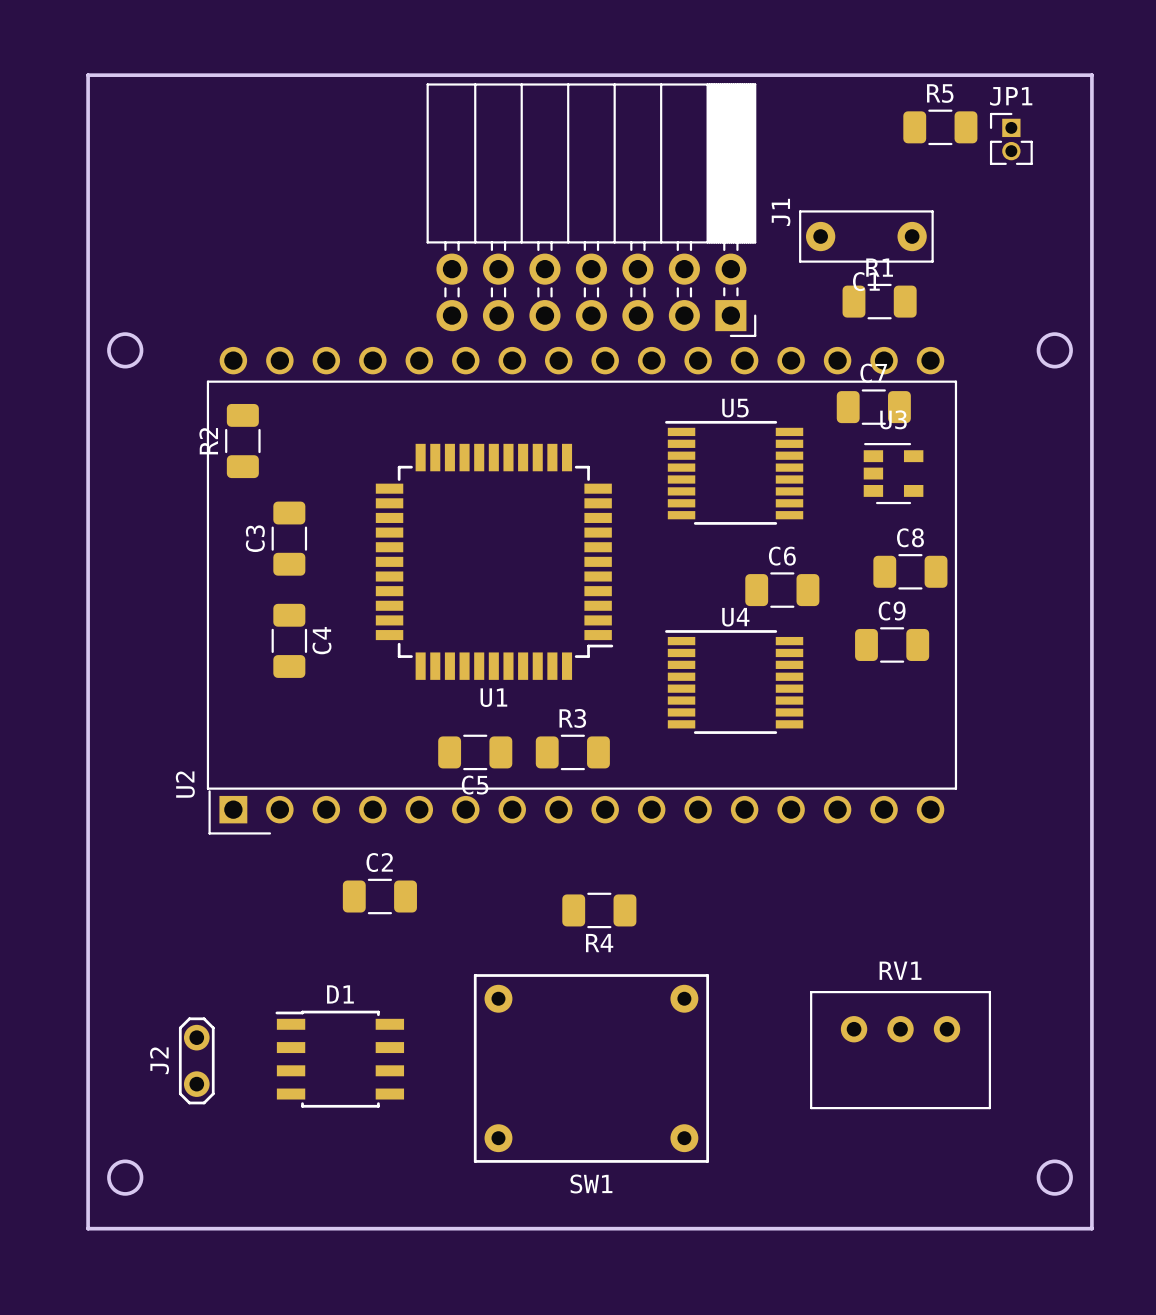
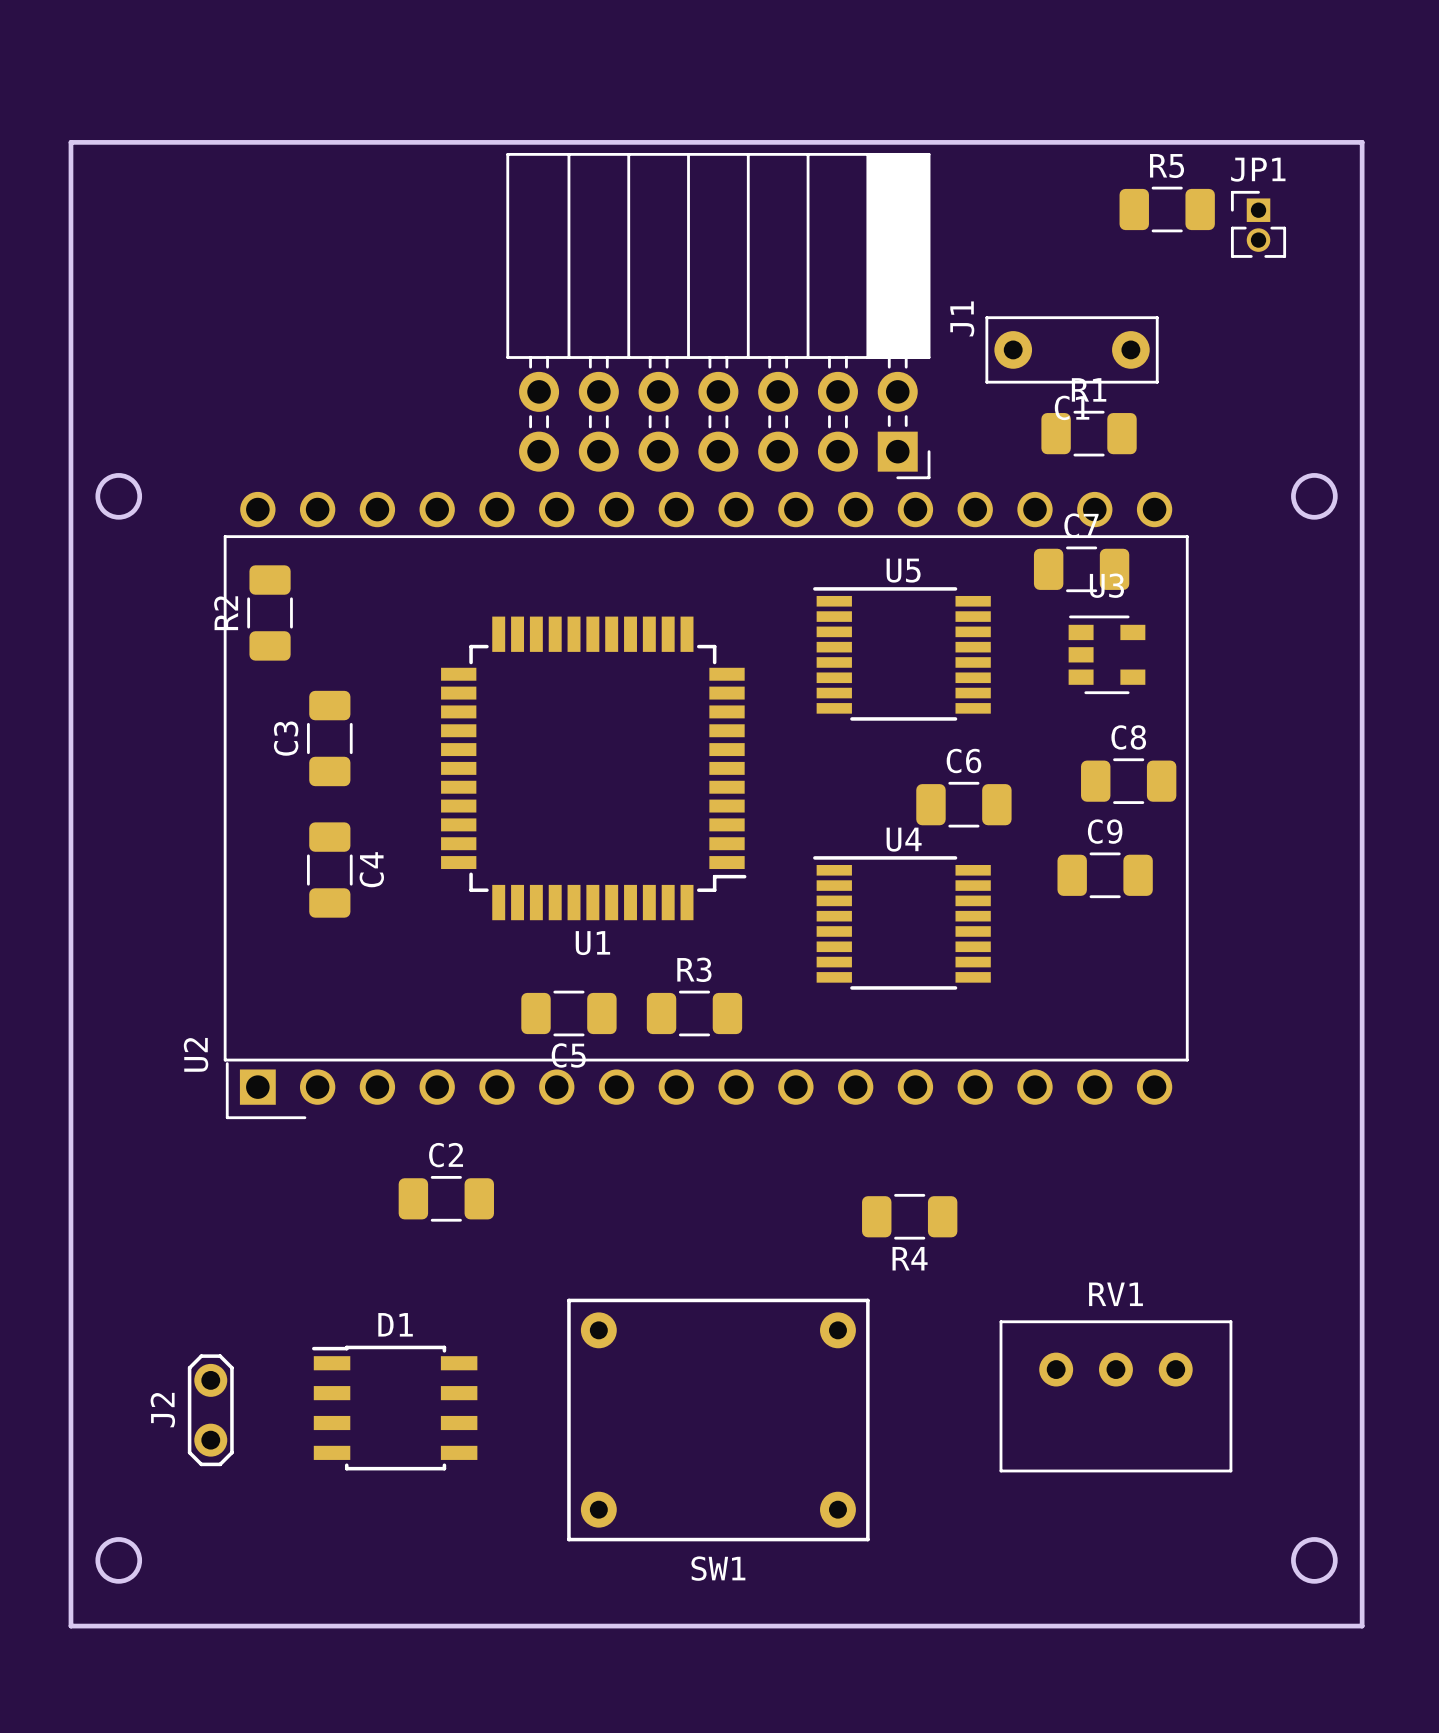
R4 position: (599, 910) -> (909, 1216)

